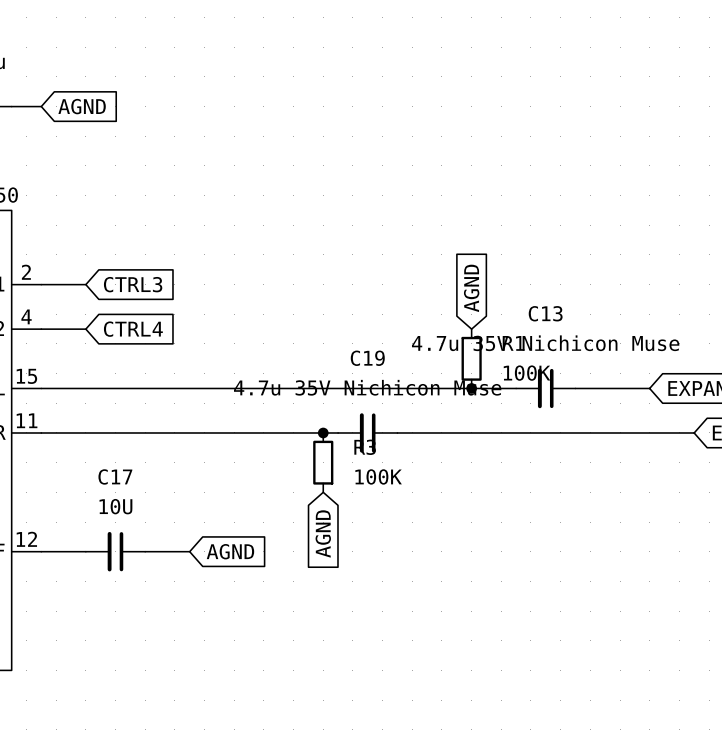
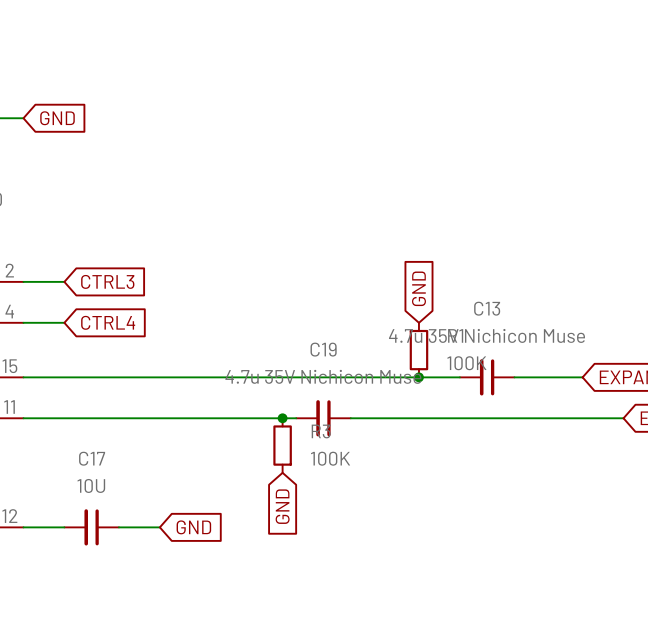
global label: AGND (82, 106) -> GND (57, 118)
global label: AGND (471, 288) -> GND (418, 288)
global label: AGND (323, 533) -> GND (282, 506)
global label: AGND (230, 551) -> GND (193, 527)

